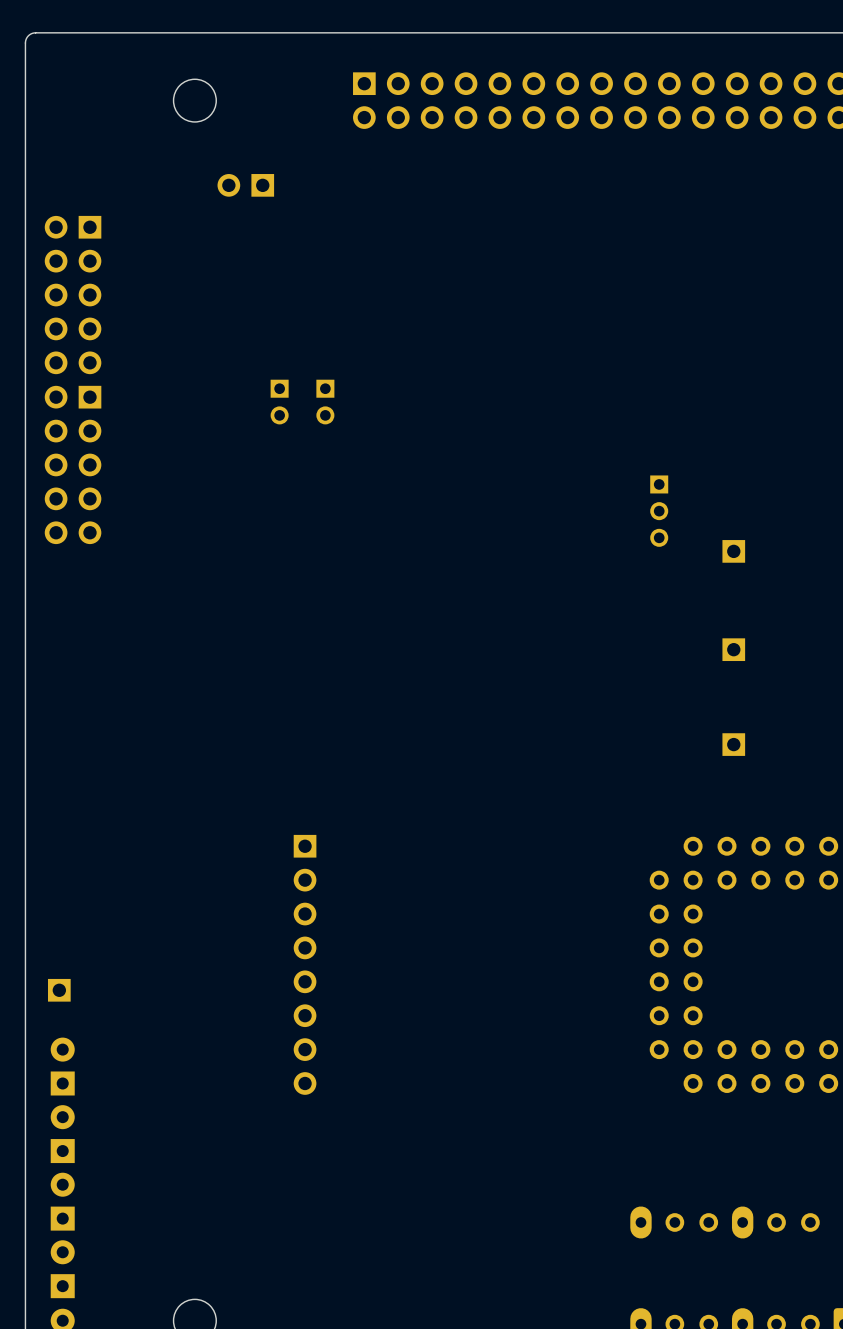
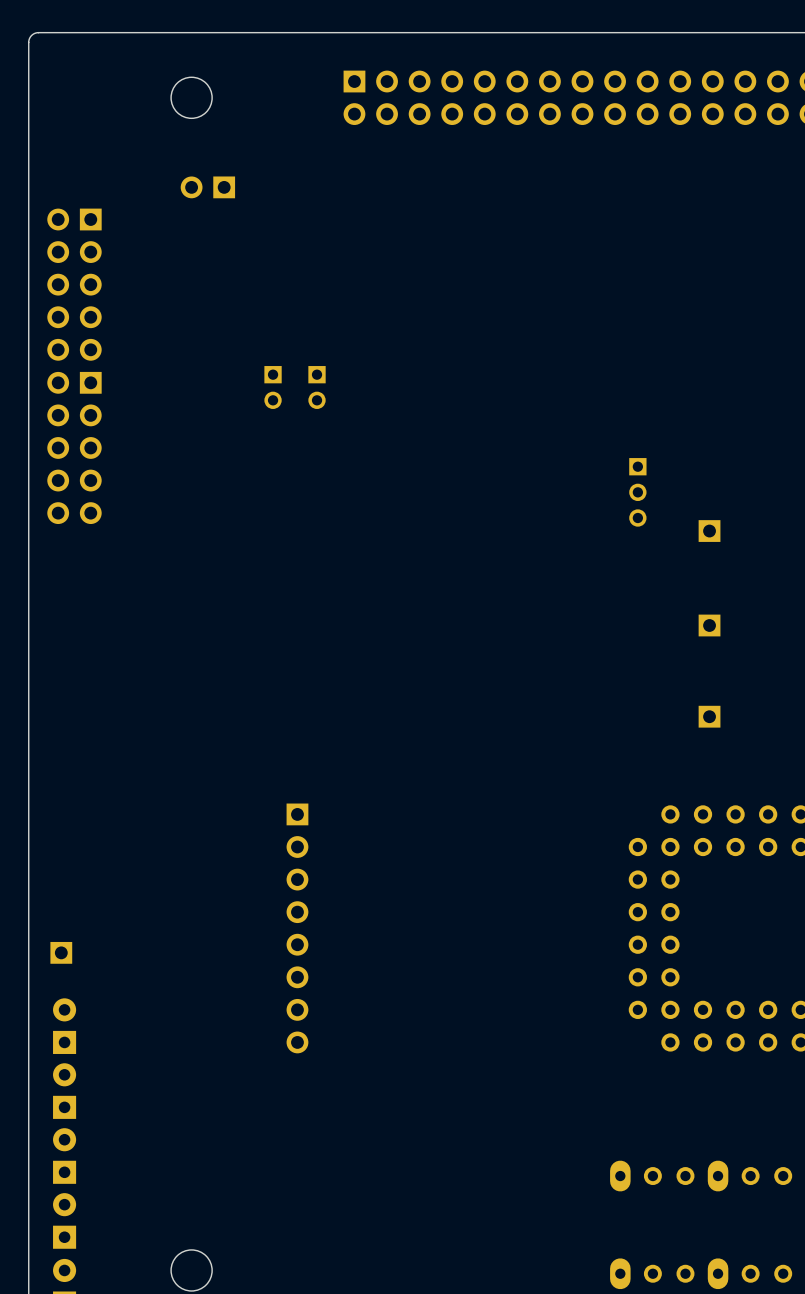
part position: (245, 185) -> (207, 187)

